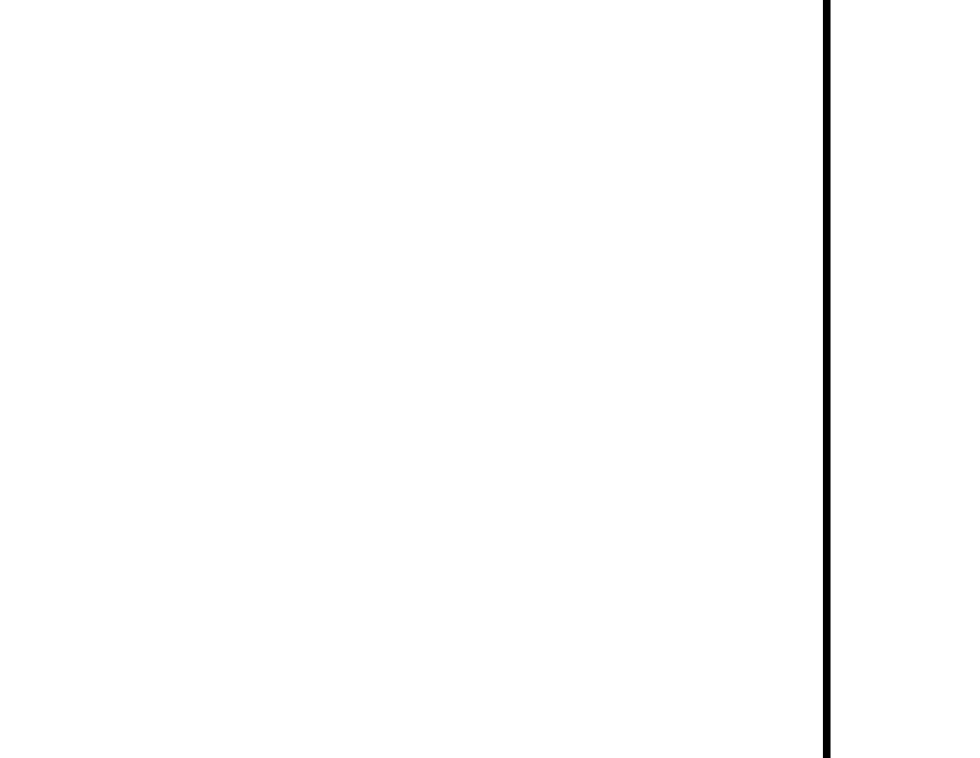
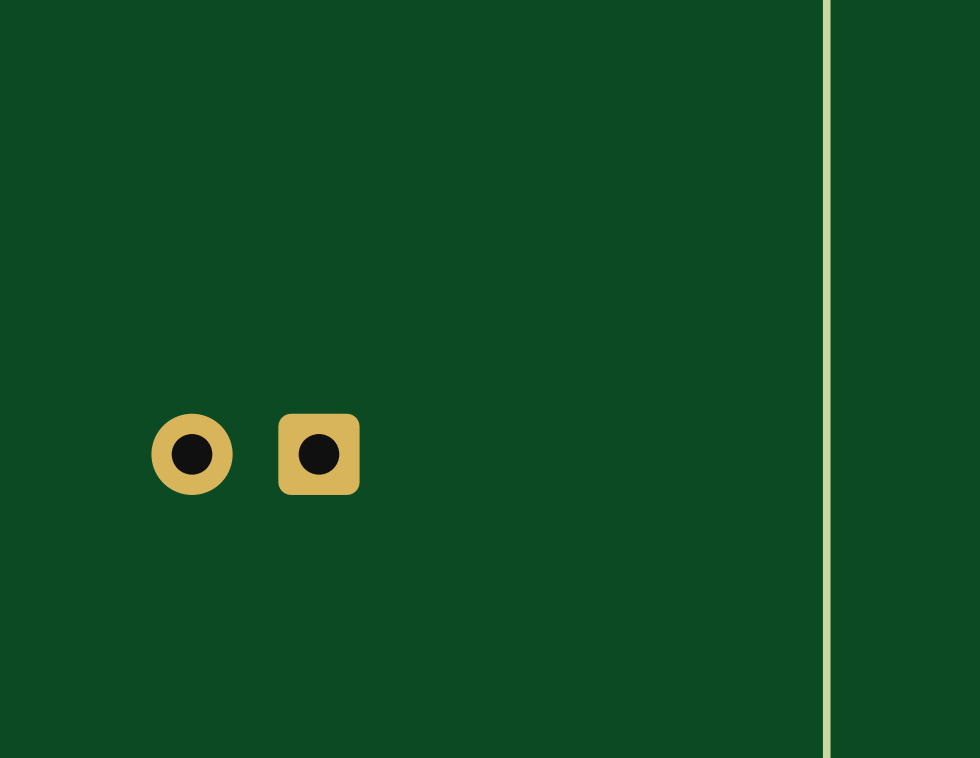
part: none -> (255, 454)

